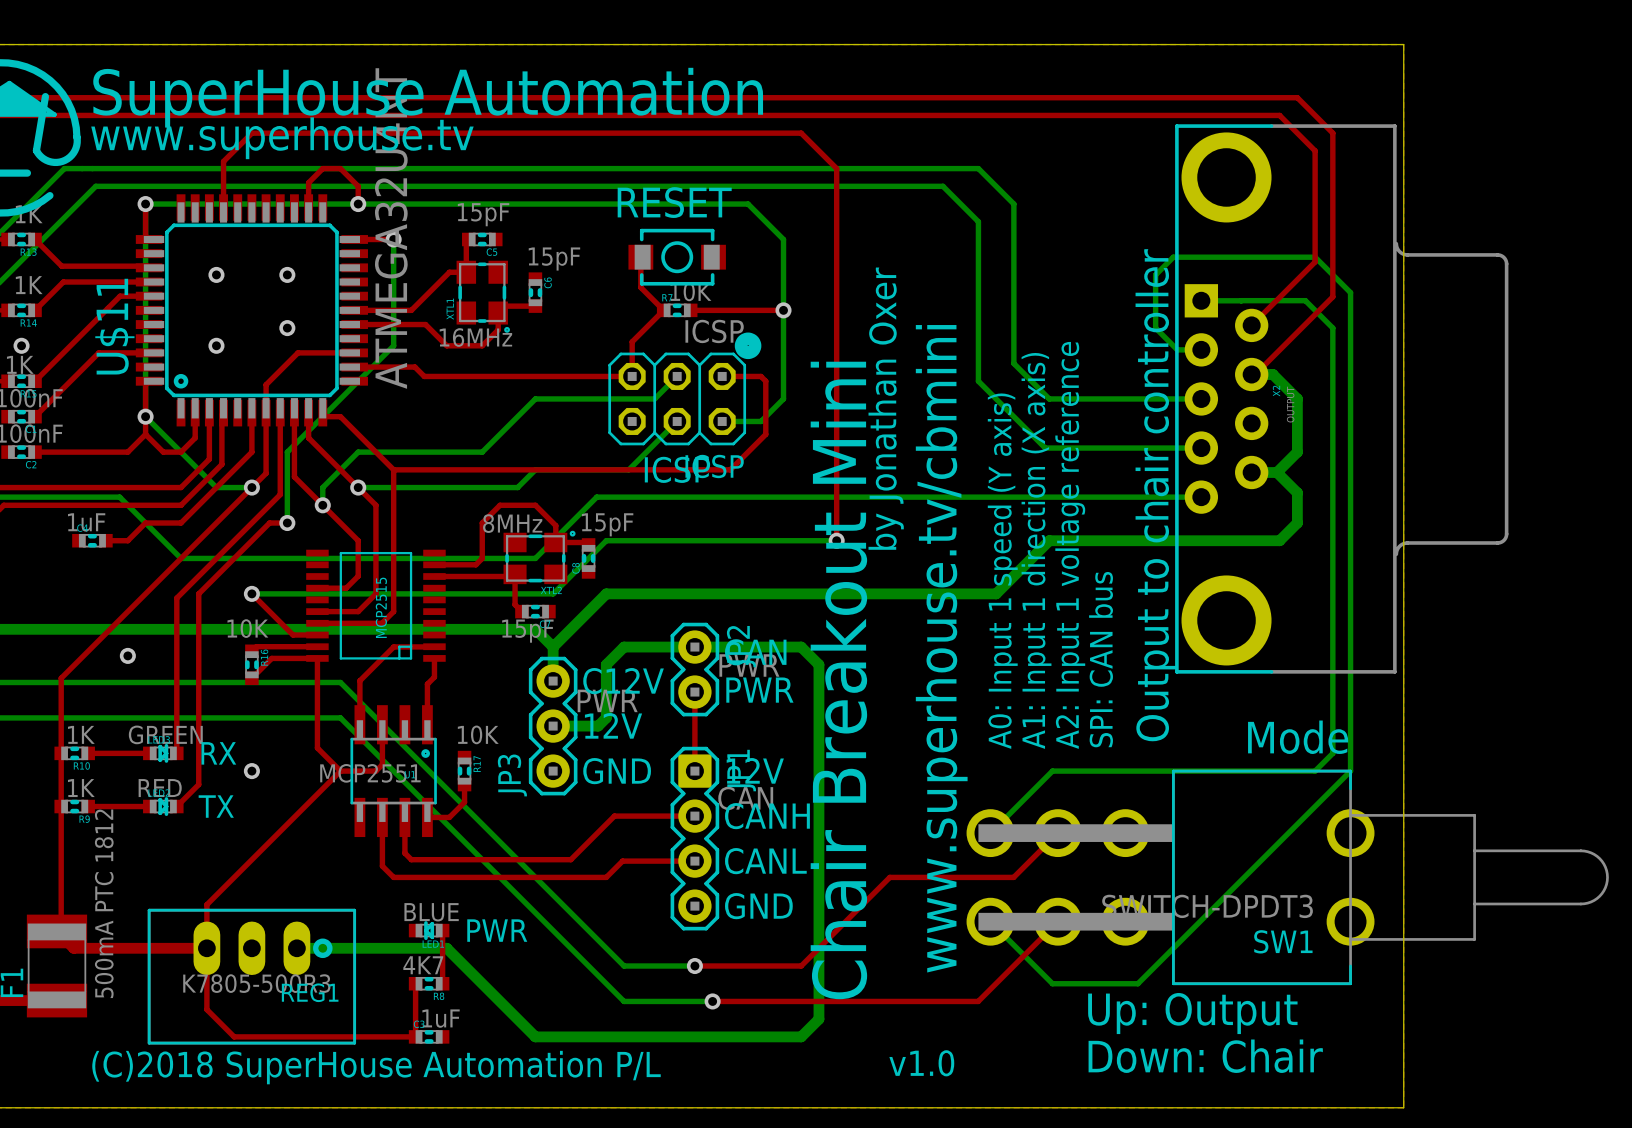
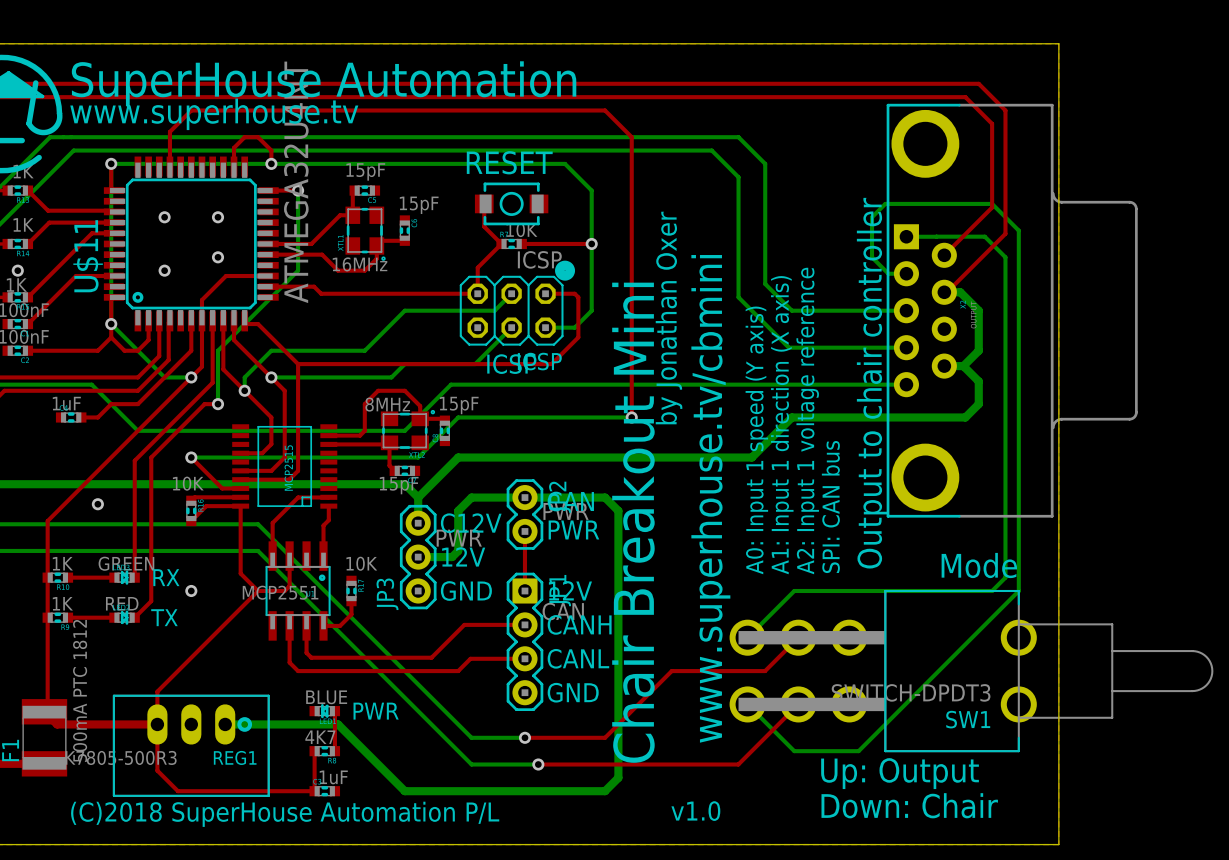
REG1 value position: K7805-500R3 (256, 983) -> K7805-500R3 (121, 757)

